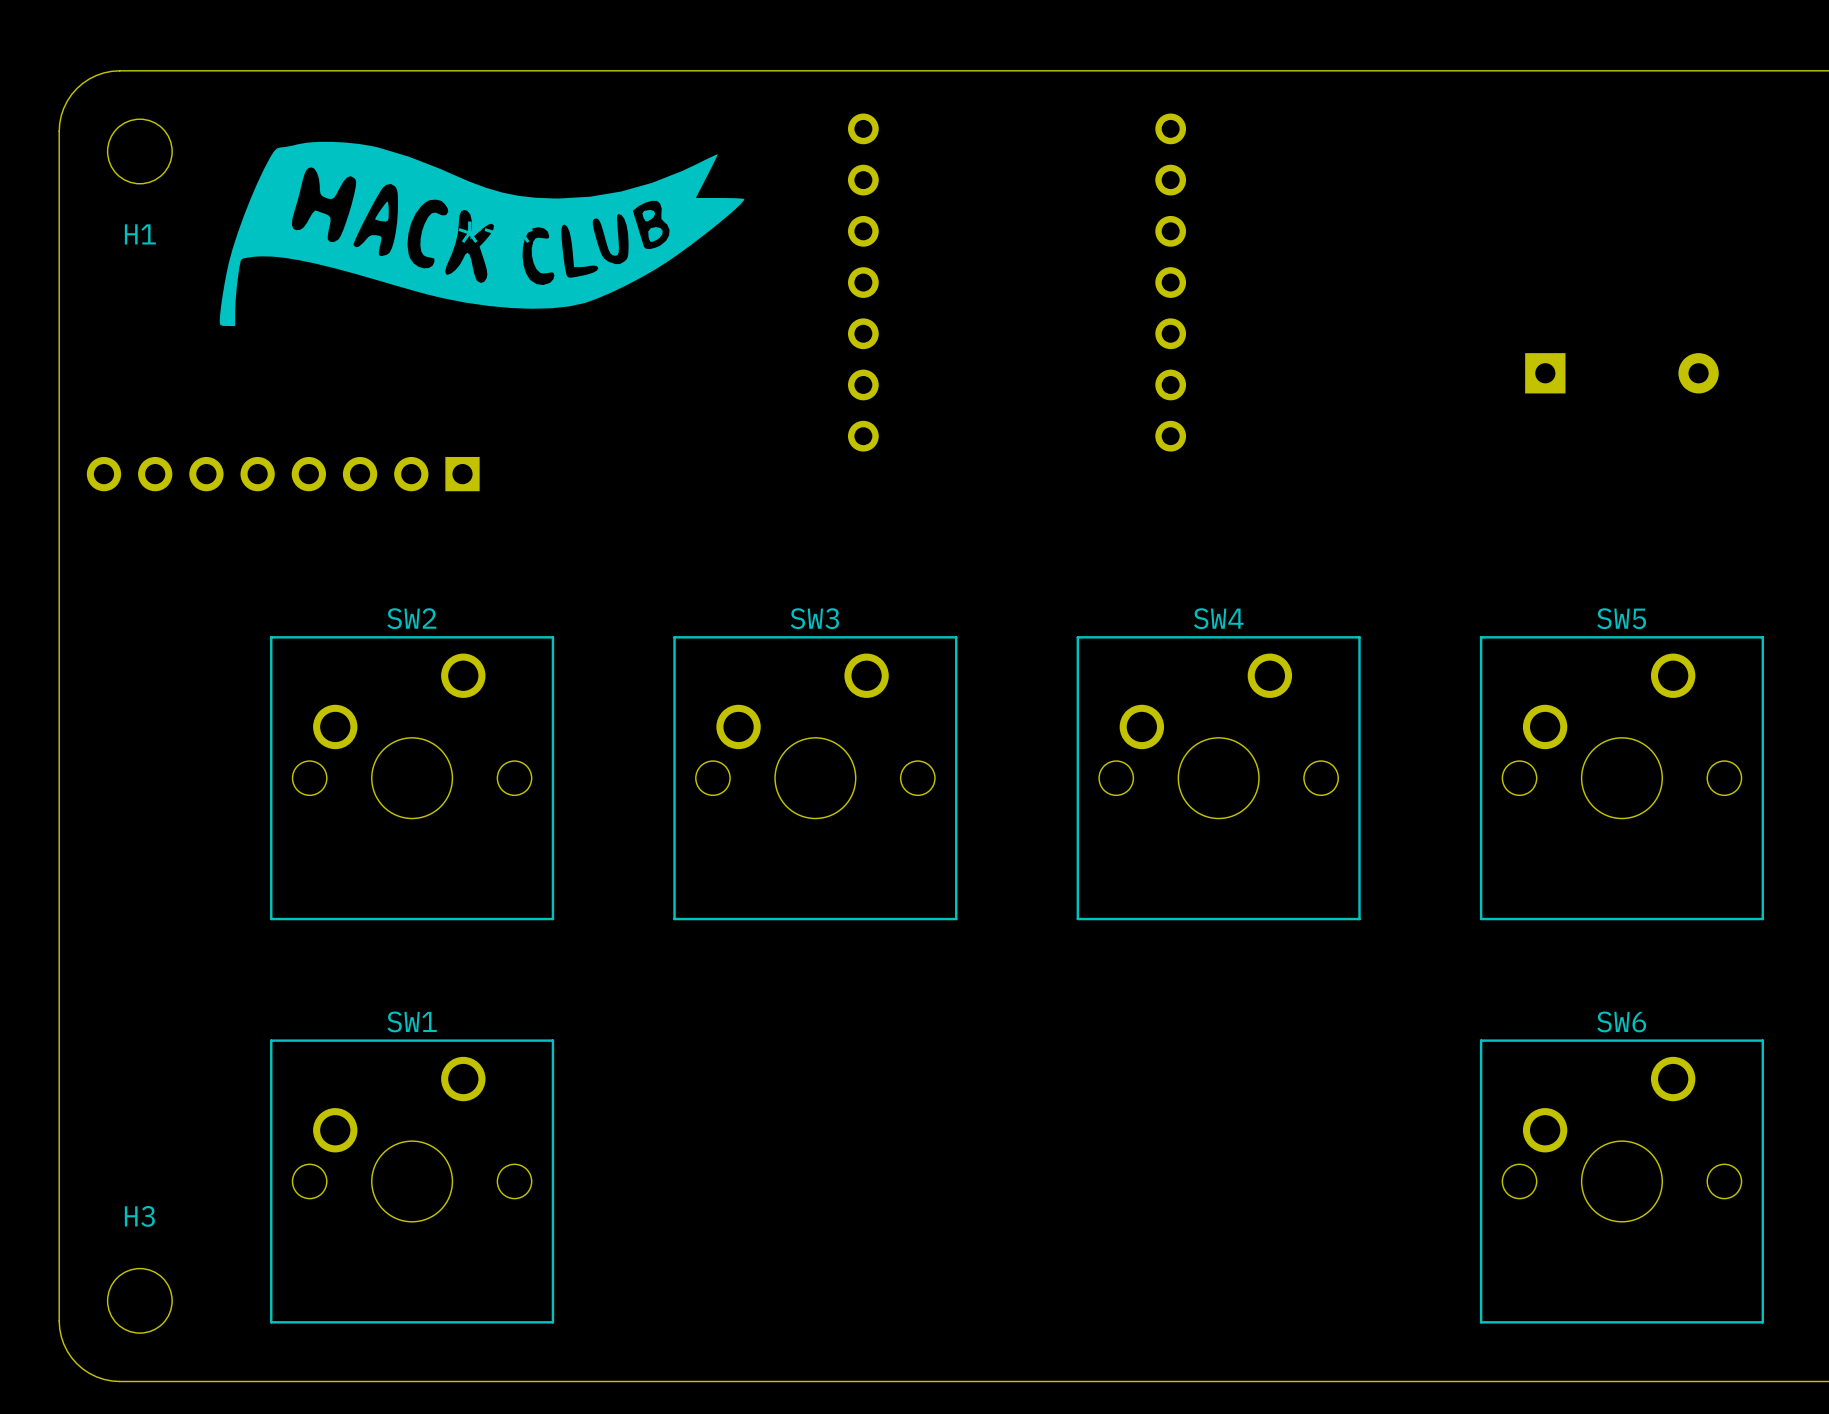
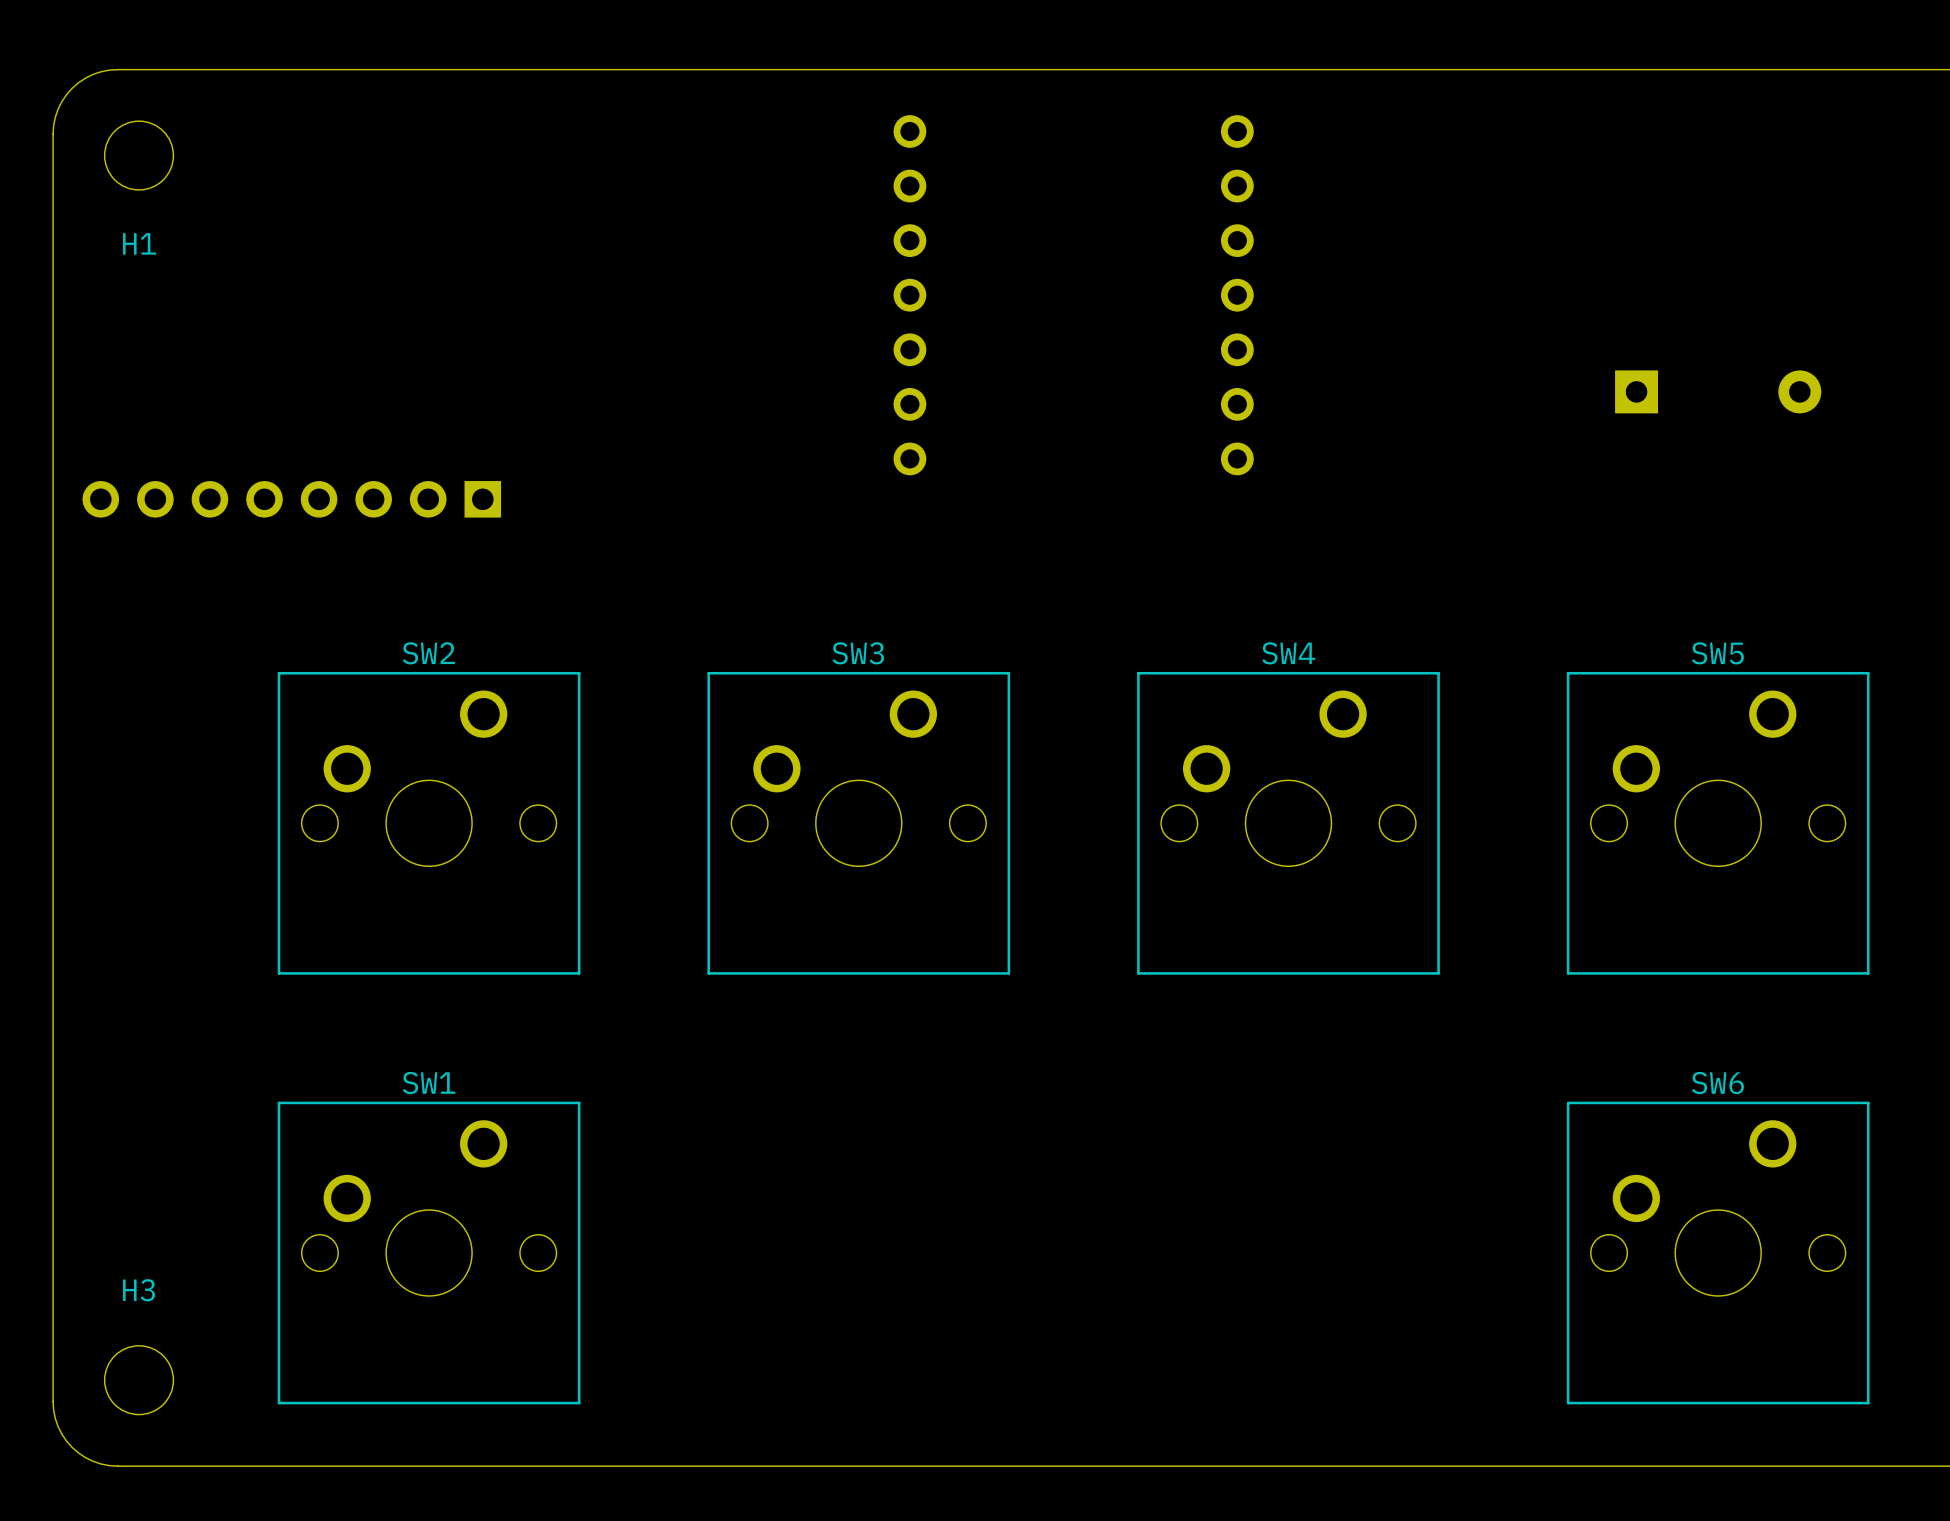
part: (482, 233) -> none

